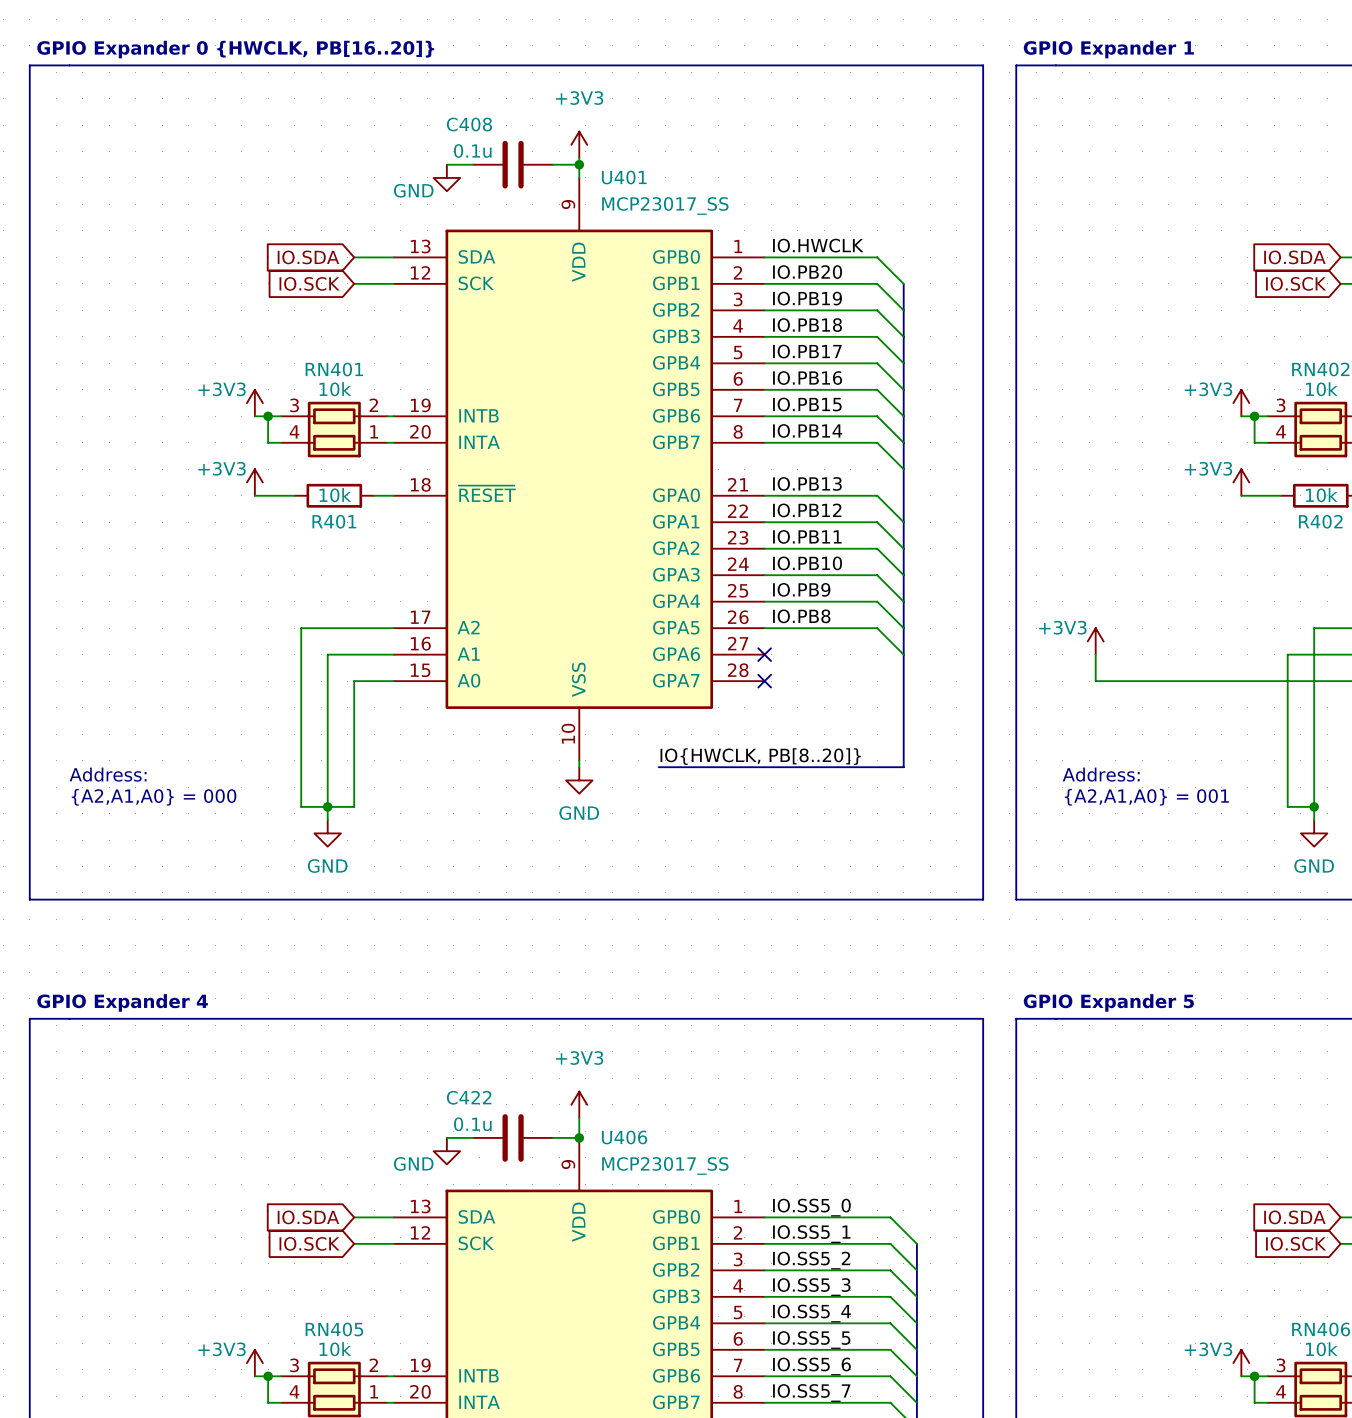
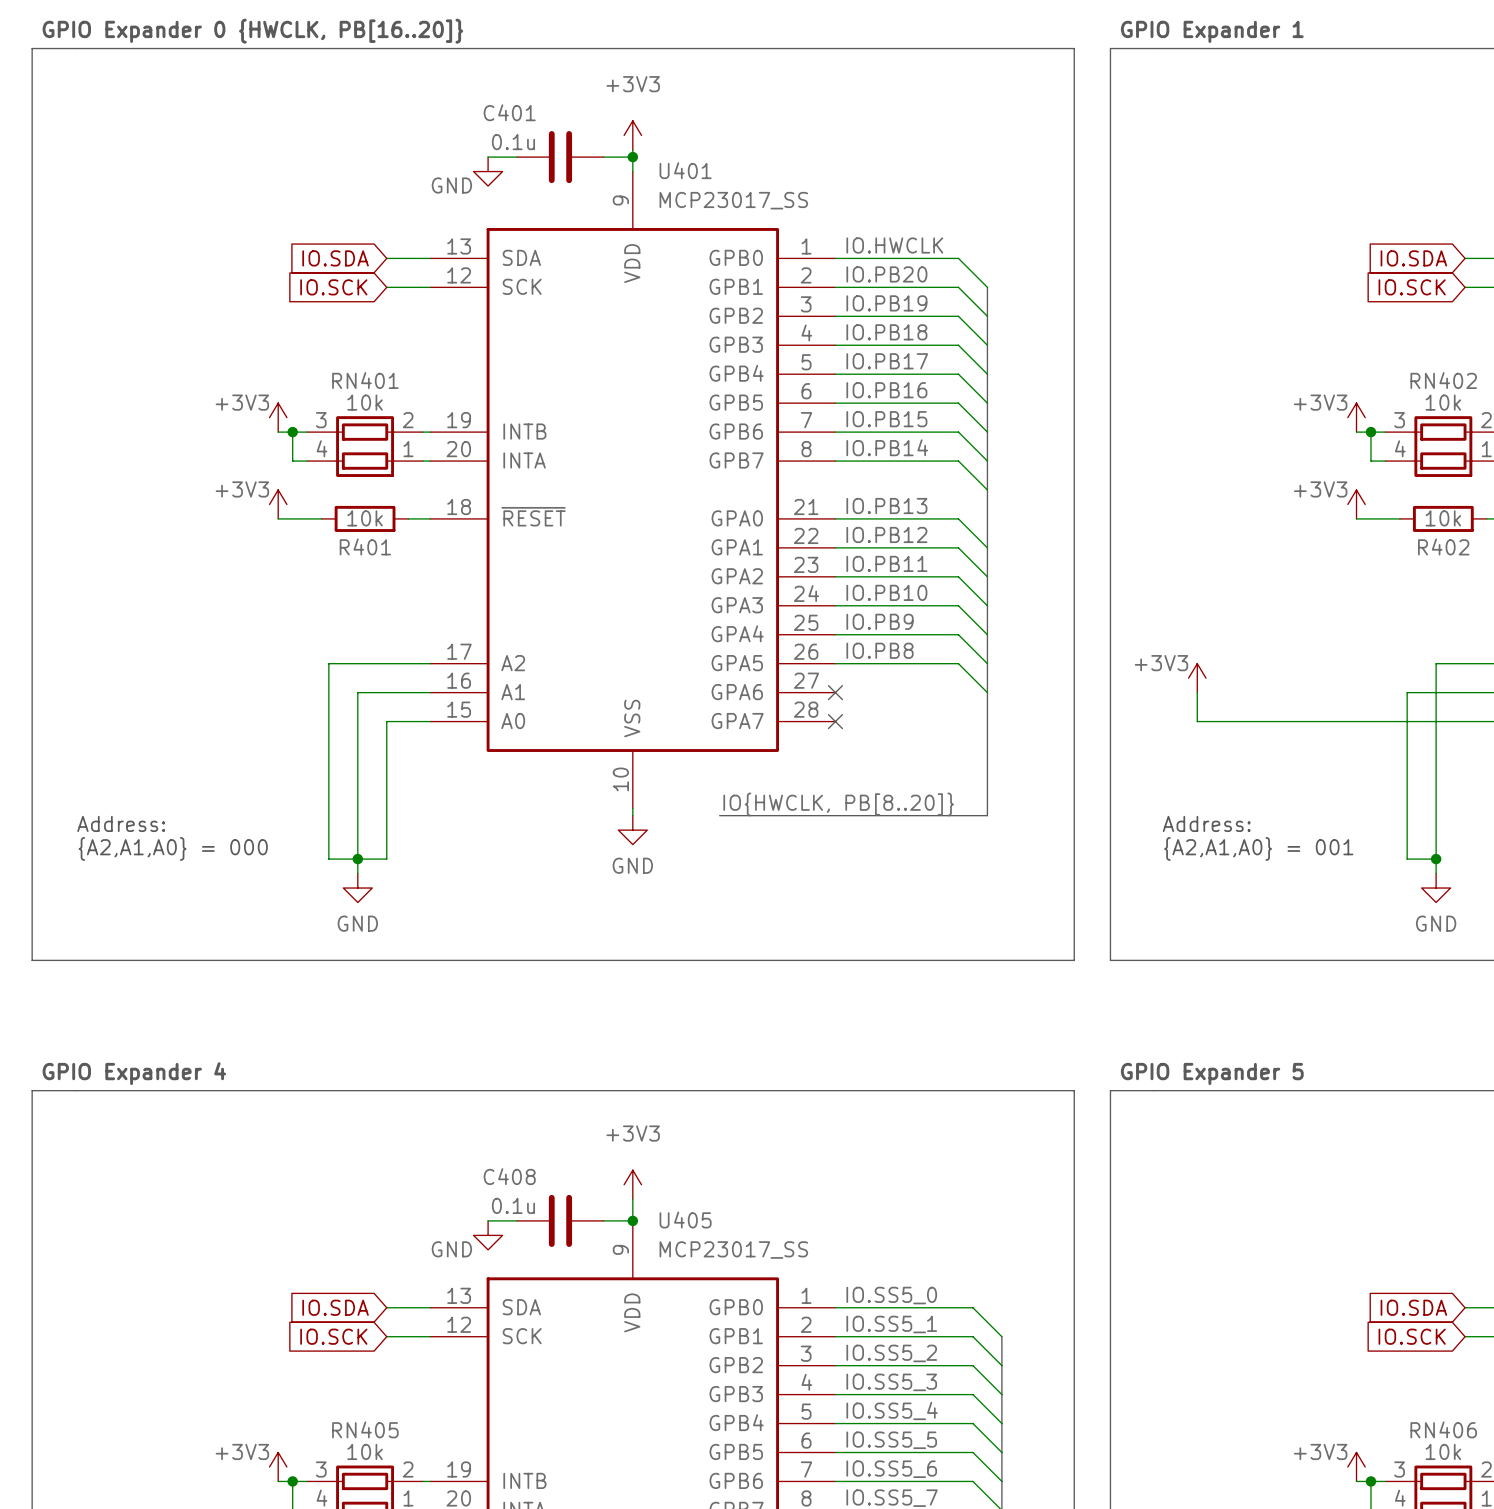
C408 name: C408 (469, 124) -> C401 (509, 112)
C422 name: C422 (469, 1097) -> C408 (509, 1176)
U406 name: U406 (624, 1137) -> U405 (685, 1220)

